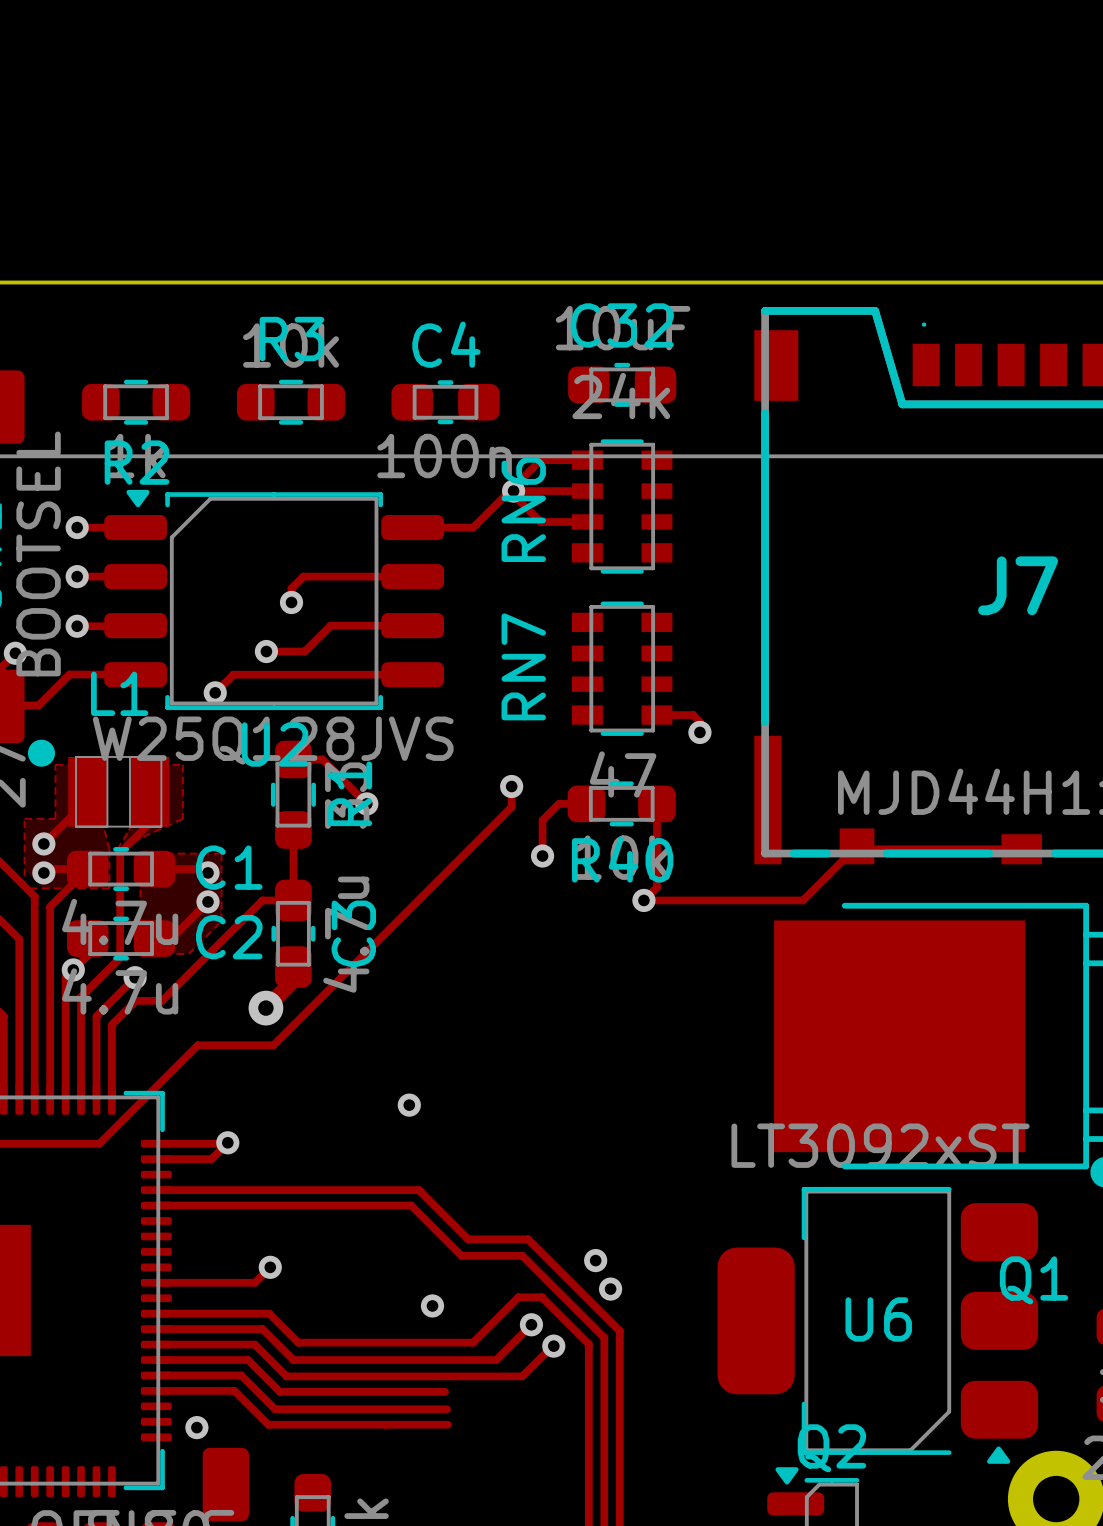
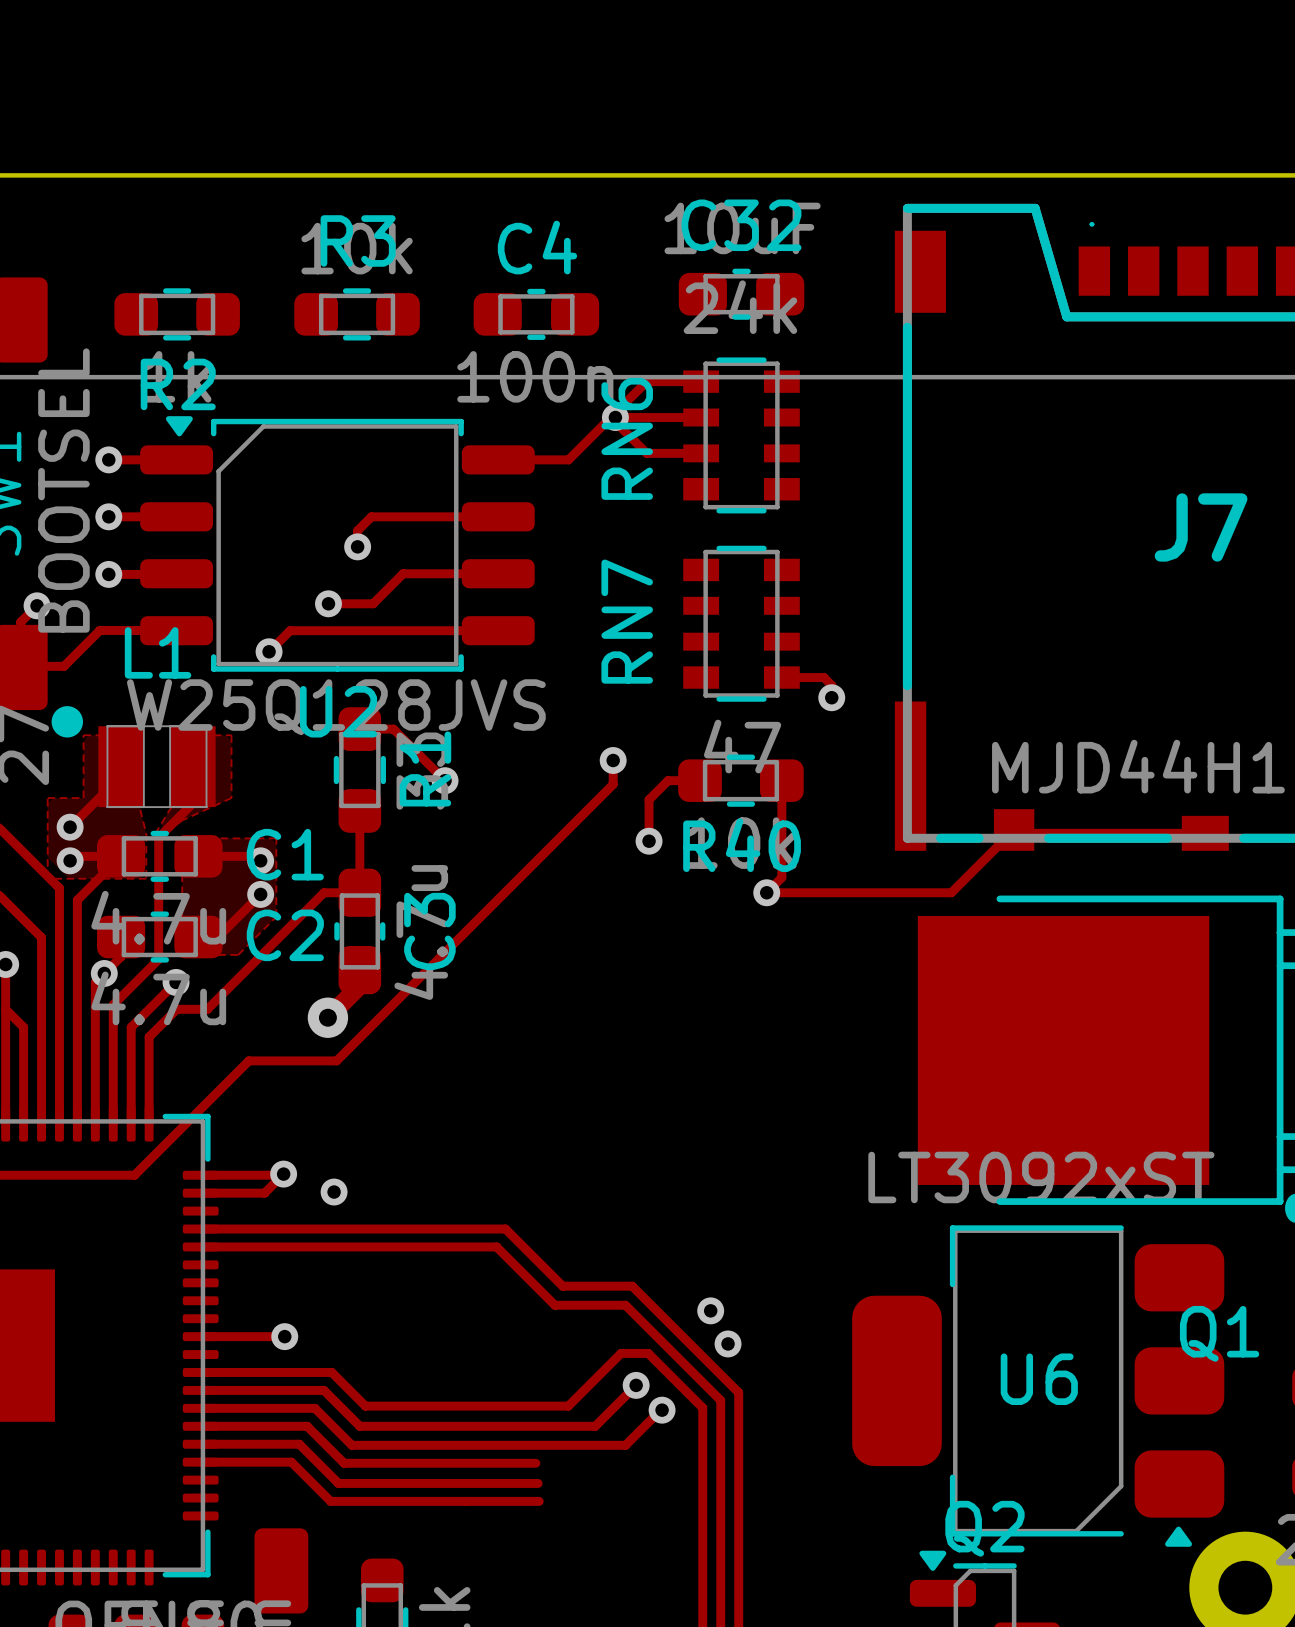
via: (409, 1105) -> none
via: none -> (334, 1192)
track: (270, 1267) (254, 1282) (228, 1282) -> none
via position: (270, 1267) -> (284, 1336)
via: (432, 1305) -> none
via: (196, 1427) -> none

